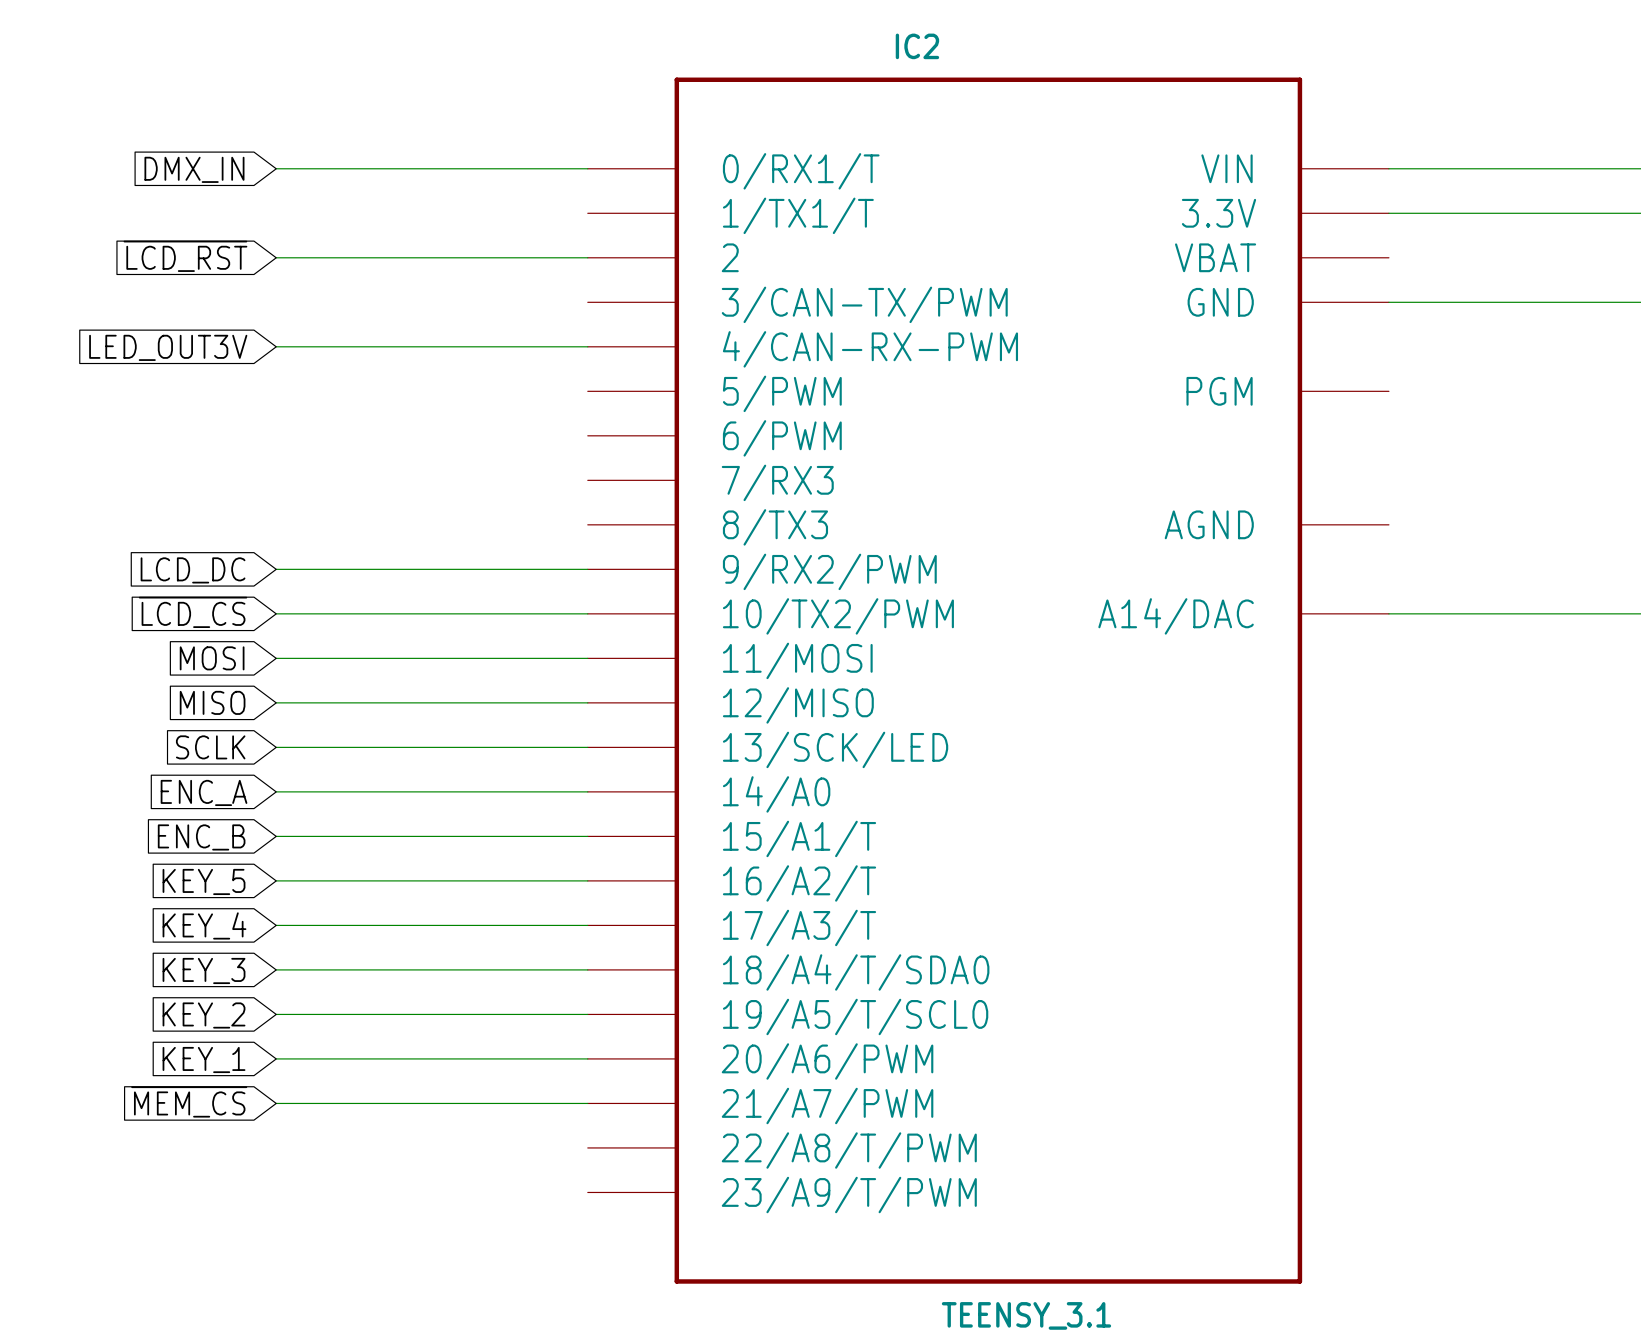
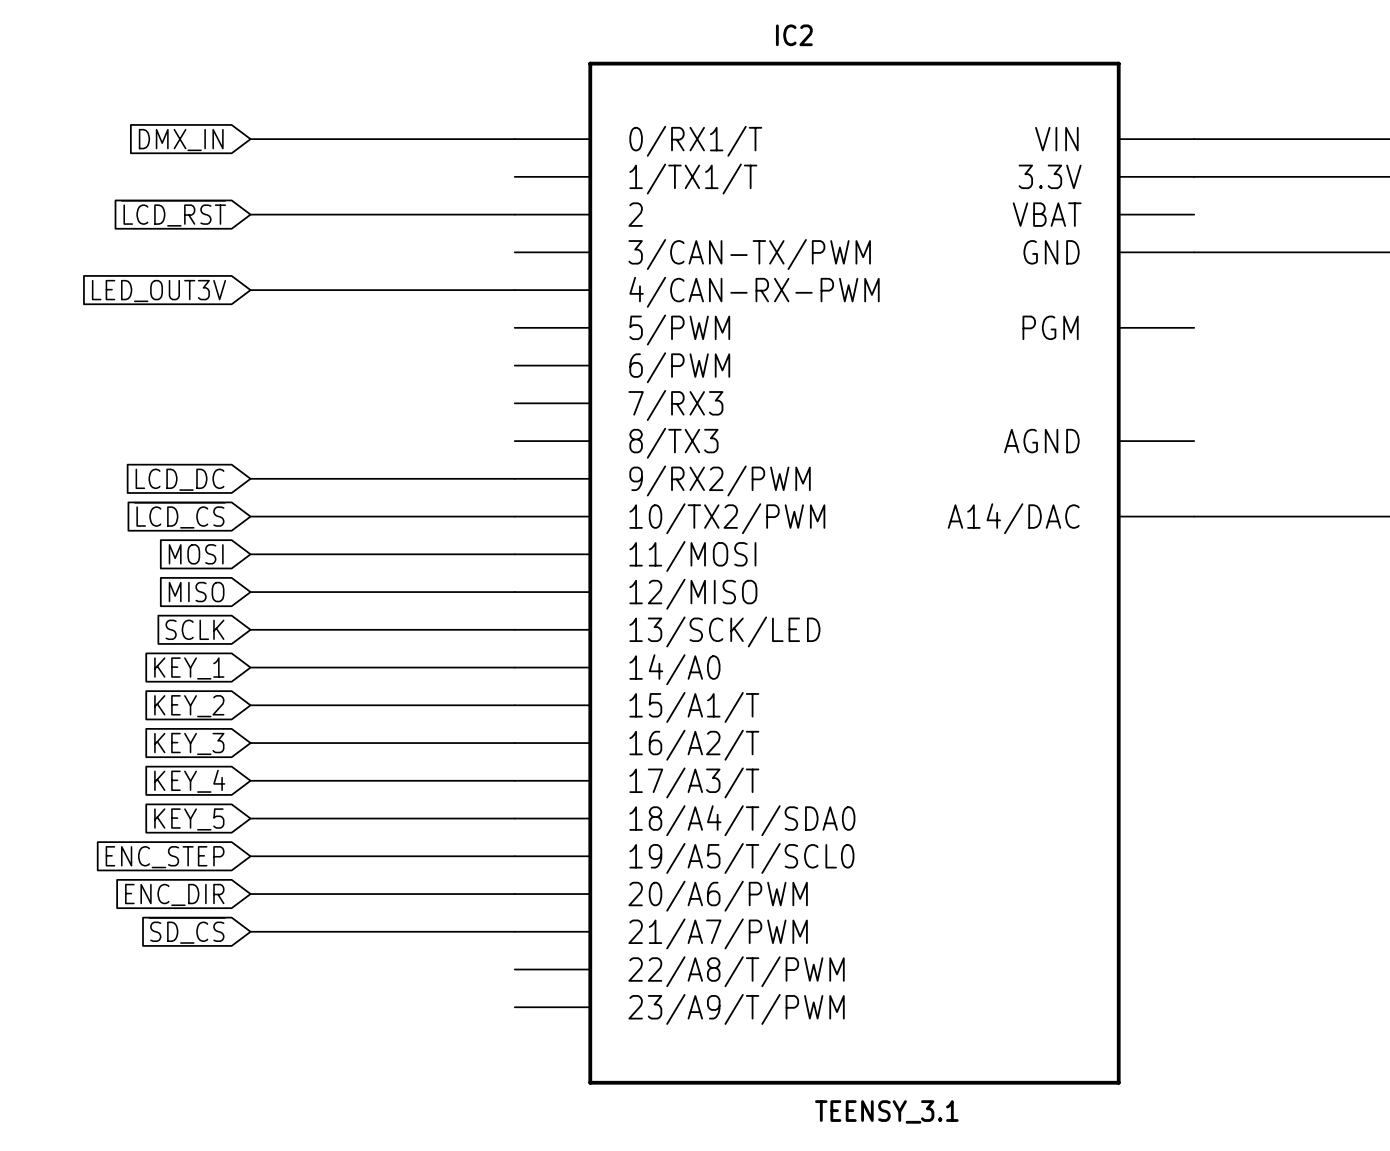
global label: ENC_A (204, 792) -> KEY_1 (189, 668)
global label: ENC_B (201, 837) -> KEY_2 (189, 706)
global label: KEY_5 (204, 881) -> KEY_3 (189, 743)
global label: KEY_3 (204, 970) -> KEY_5 (189, 819)
global label: KEY_2 (204, 1015) -> ENC_STEP (165, 857)
global label: KEY_1 (204, 1060) -> ENC_DIR (174, 894)
global label: ~{MEM_CS} (189, 1101) -> ~{SD_CS} (187, 930)

